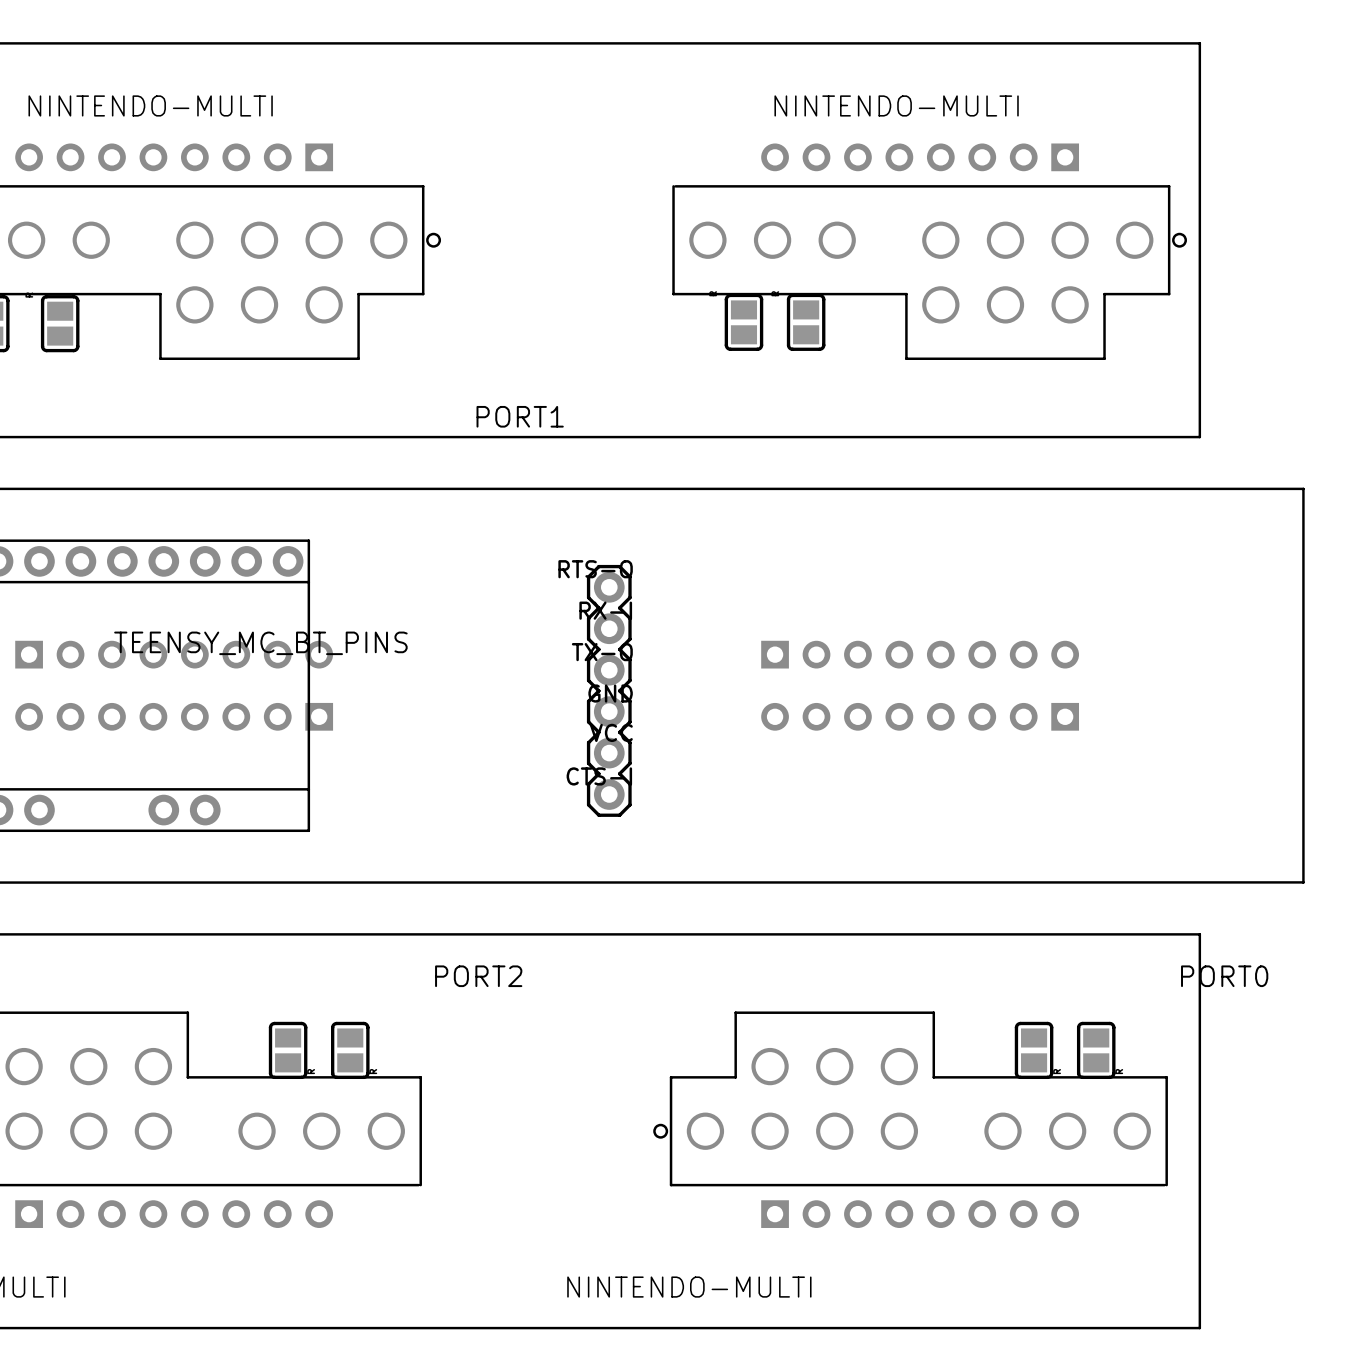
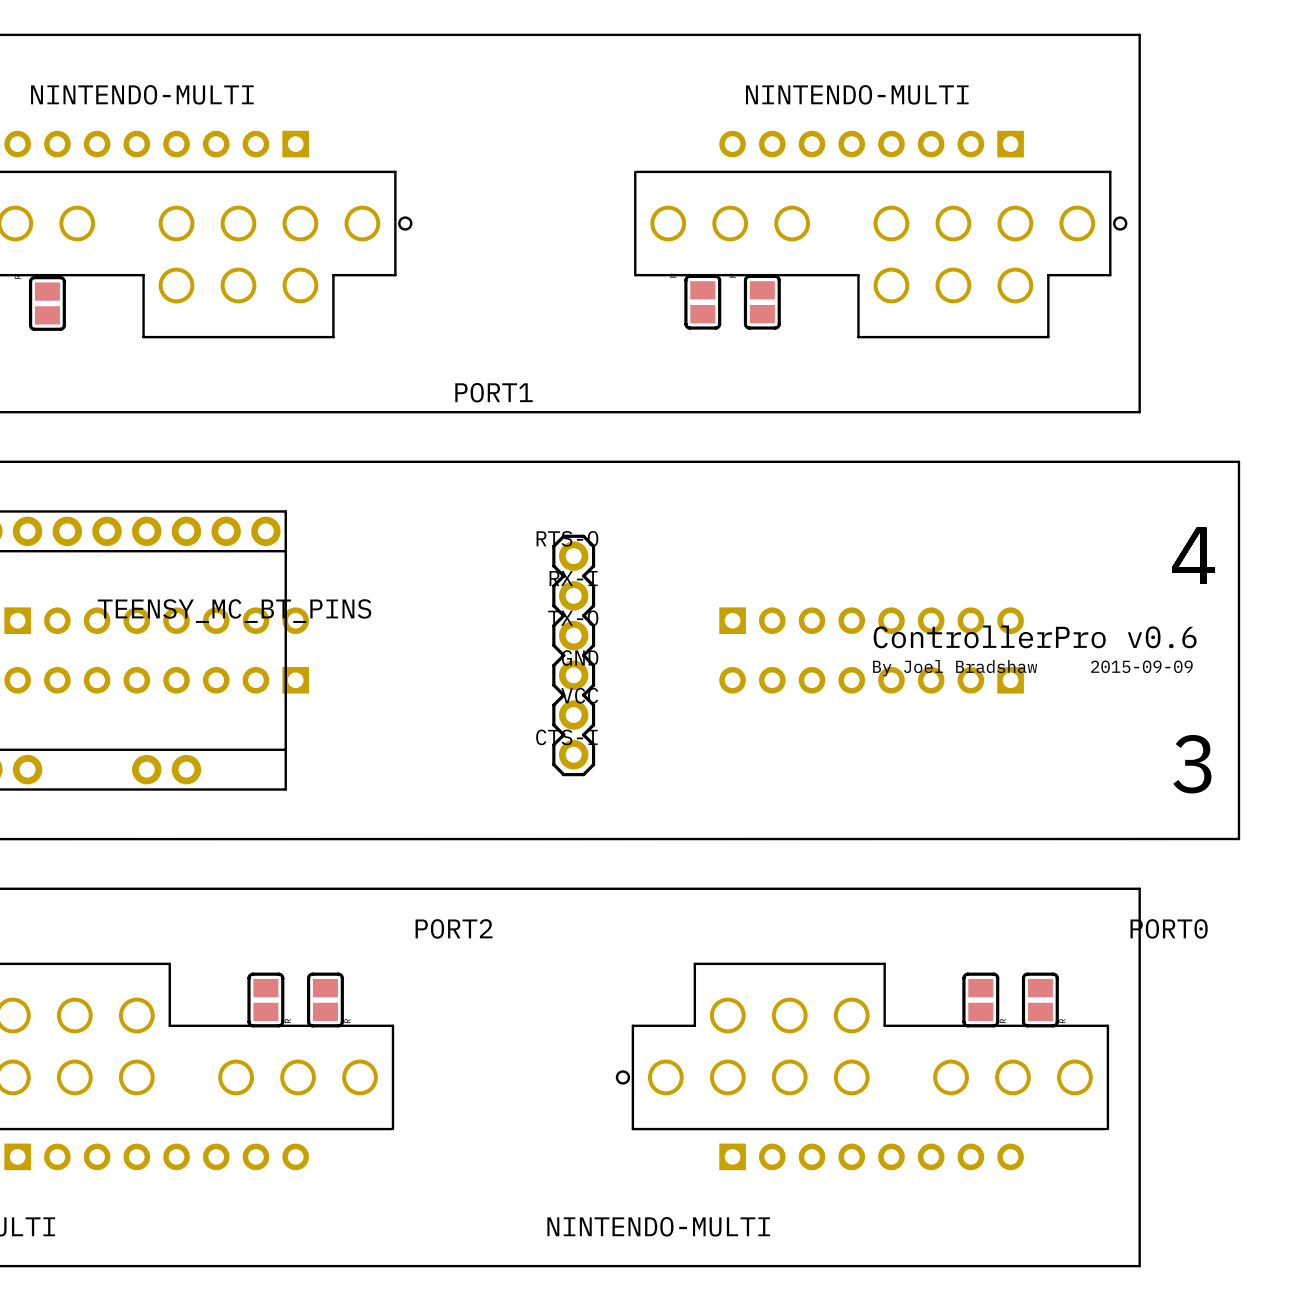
text: none -> 4 (1193, 555)
text: none -> ControllerPro v0.6 (1035, 636)
text: none -> 2015-09-09 (1141, 666)
text: none -> By Joel Bradshaw (955, 668)
text: none -> 3 (1192, 764)

